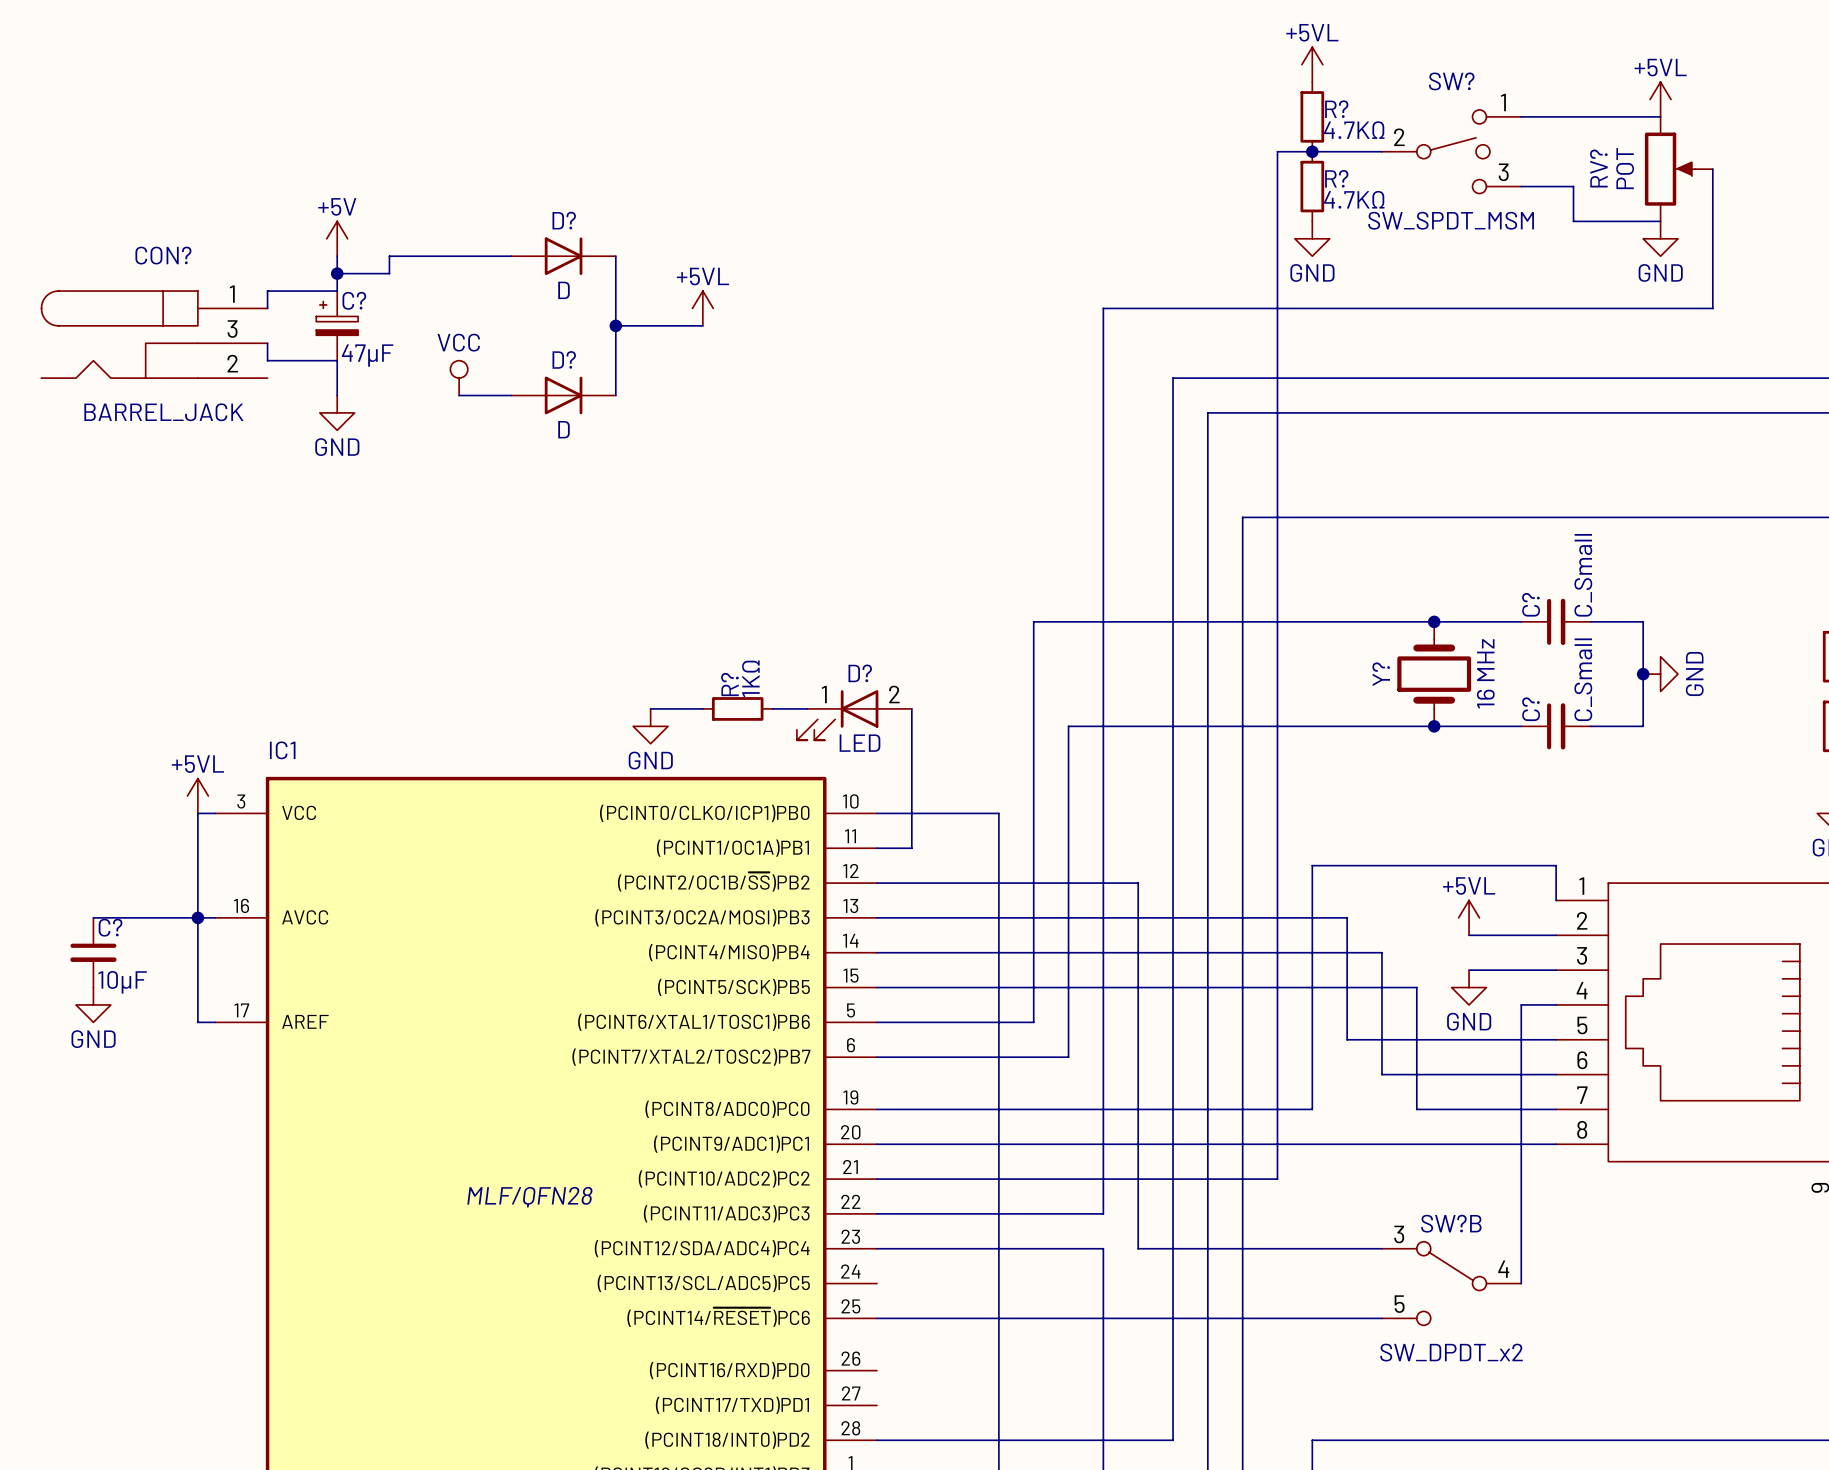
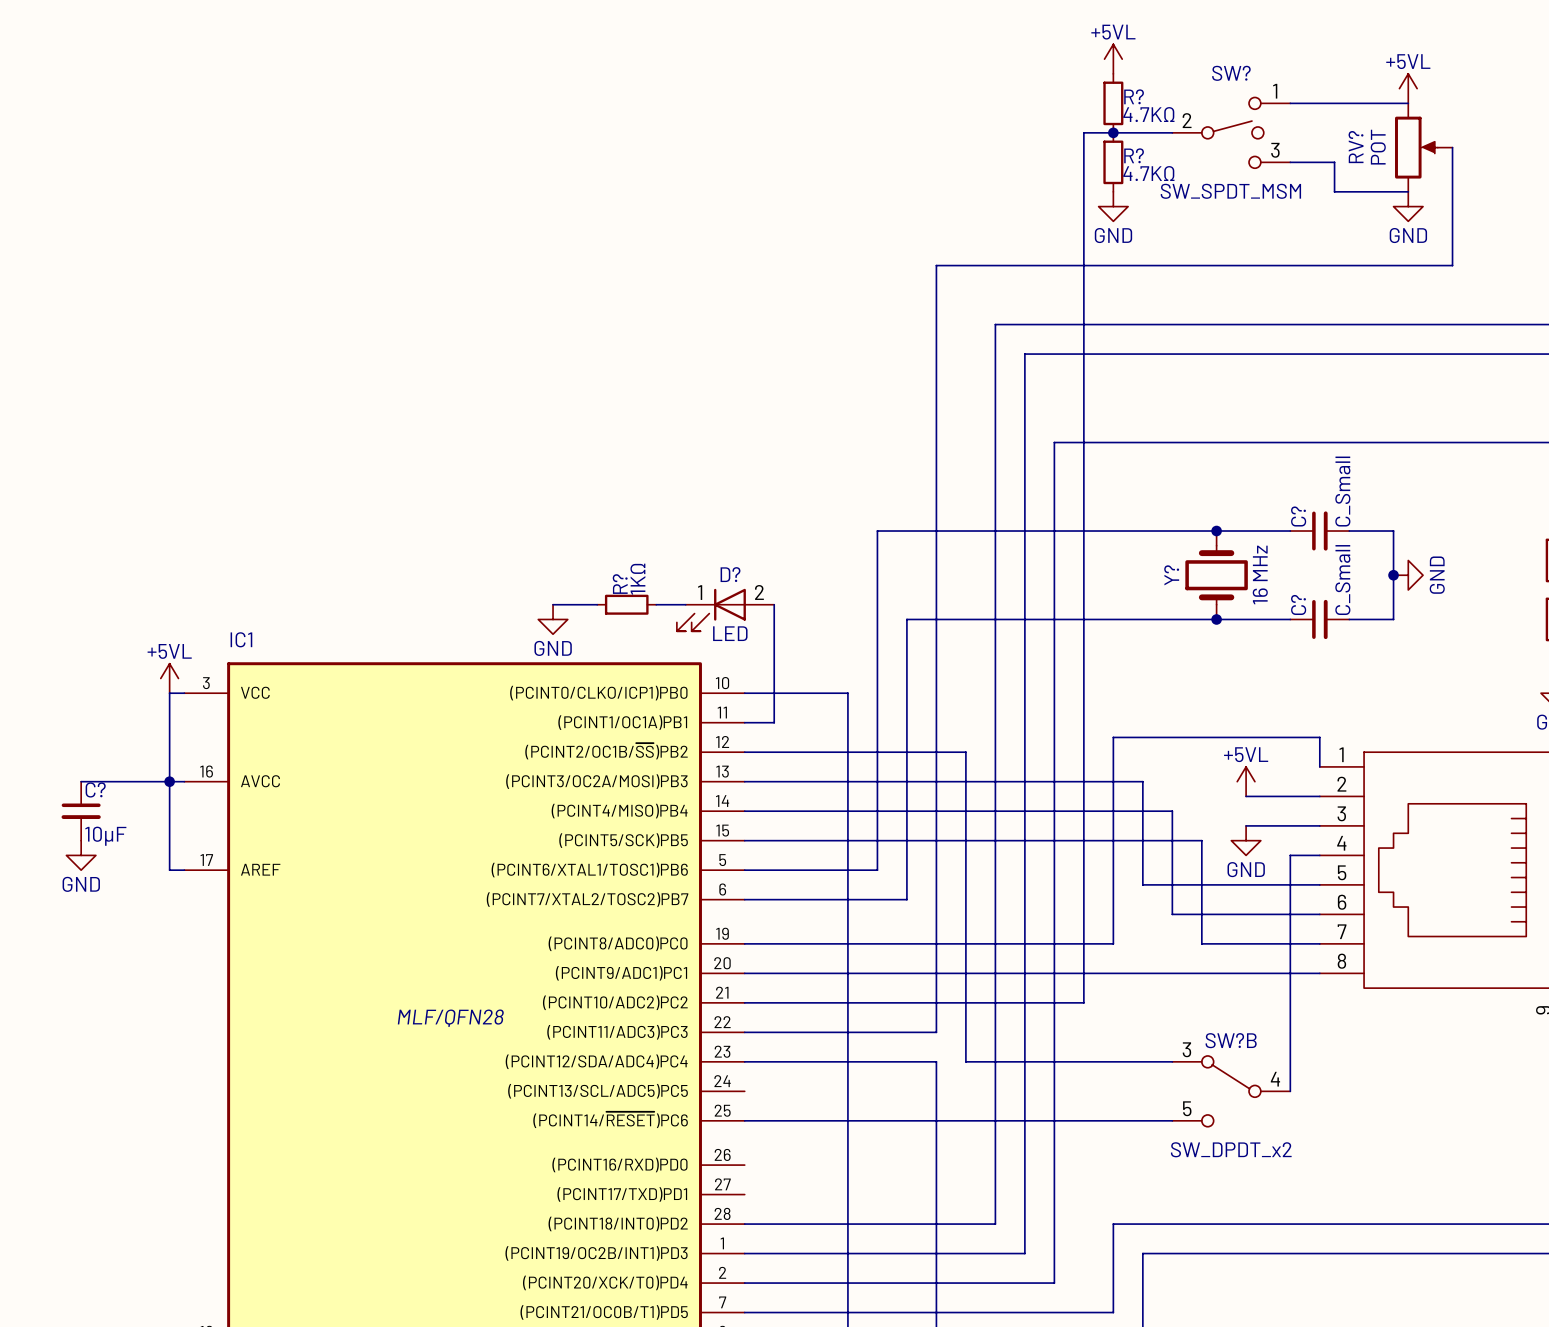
power symbol: +5V (337, 238) -> none
wire: (337, 256) (337, 291) (267, 291) (267, 308) -> none
wire: (511, 256) (389, 256) (389, 273) (337, 273) -> none
D?: D (563, 256) -> none
wire: (615, 256) (615, 395) -> none
junction: (337, 273) -> none
power symbol: +5VL (702, 308) -> none
C?: 47µF (337, 325) -> none
wire: (615, 325) (702, 325) -> none
junction: (615, 325) -> none
CON?: BARREL_JACK (154, 334) -> none
wire: (267, 343) (267, 360) (337, 360) (337, 395) -> none
power symbol: VCC (459, 378) -> none
wire: (459, 395) (511, 395) -> none
D?: D (563, 395) -> none
power symbol: GND (337, 412) -> none

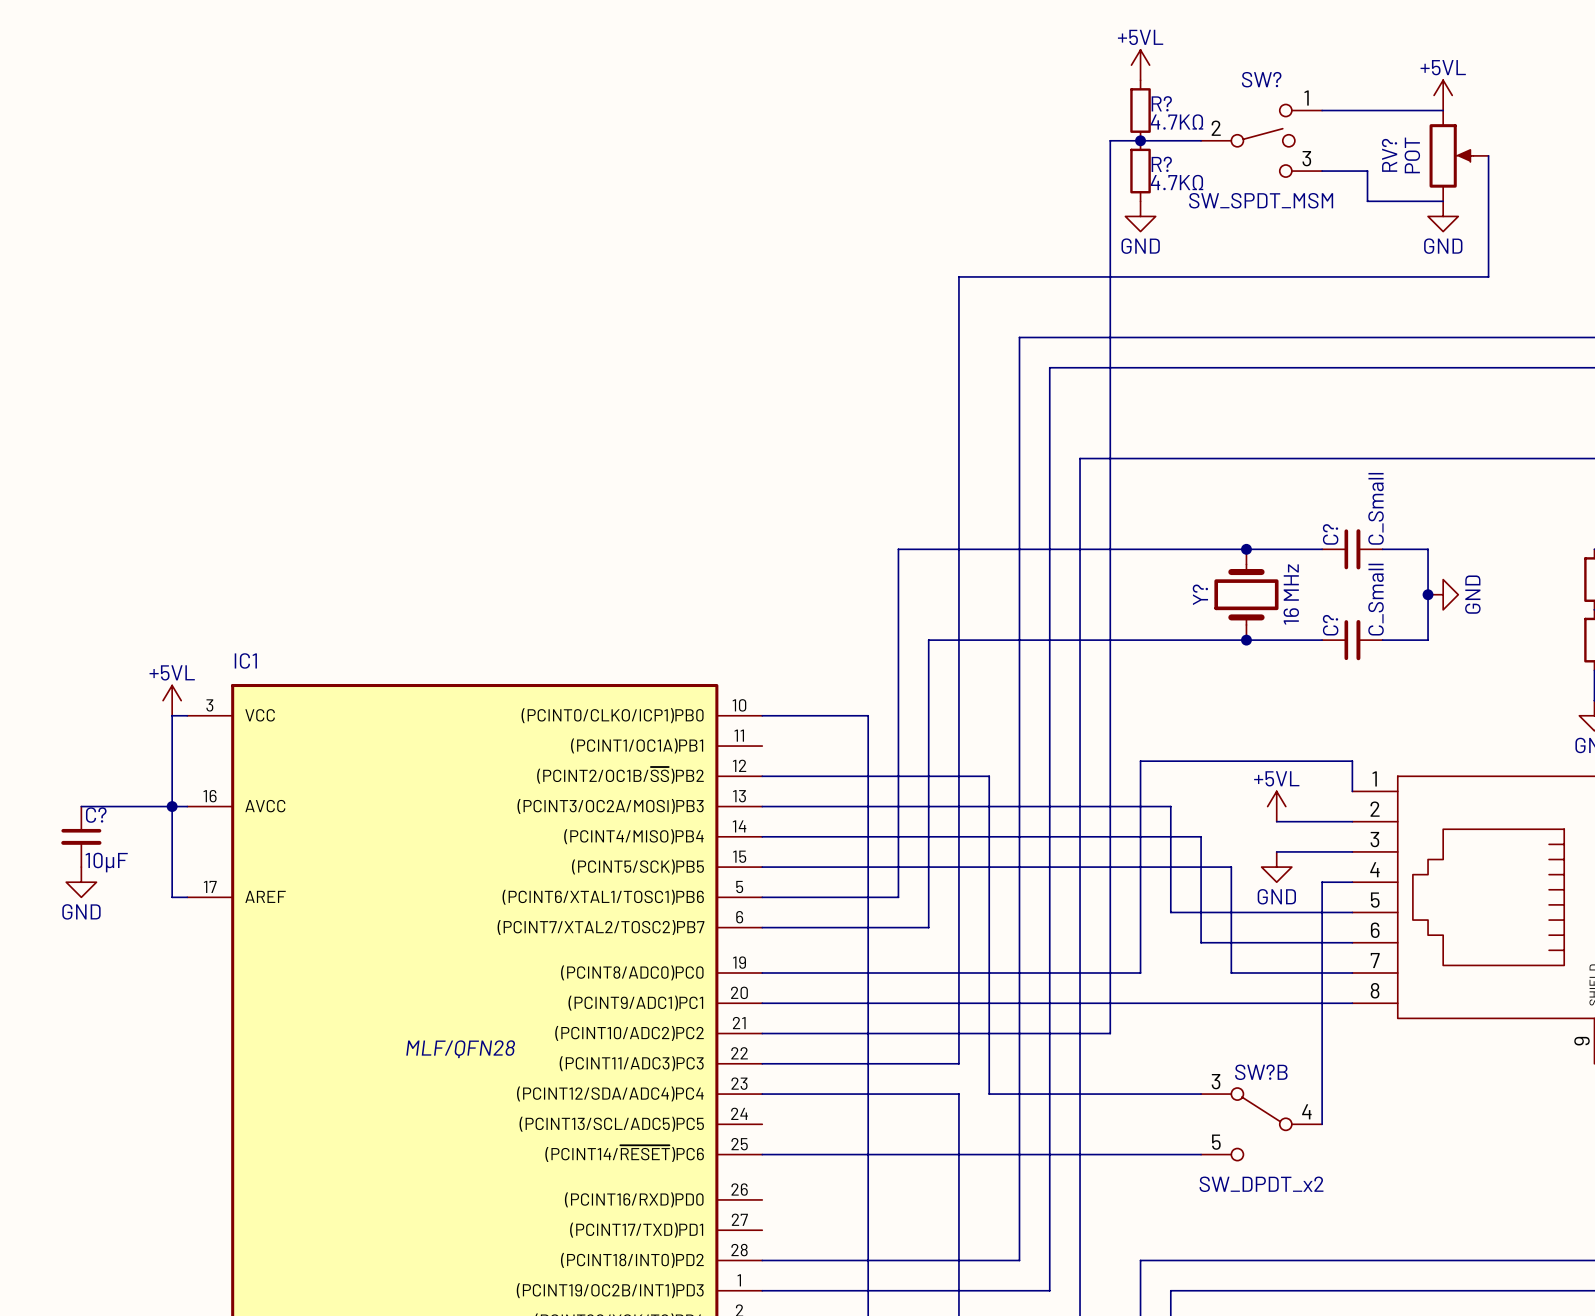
wire: (553, 604) (597, 604) -> none
R?: 1KΩ (626, 604) -> none
wire: (656, 604) (685, 604) -> none
wire: (774, 604) (774, 722) (744, 722) -> none
D?: LED (725, 610) -> none
power symbol: GND (553, 619) -> none

